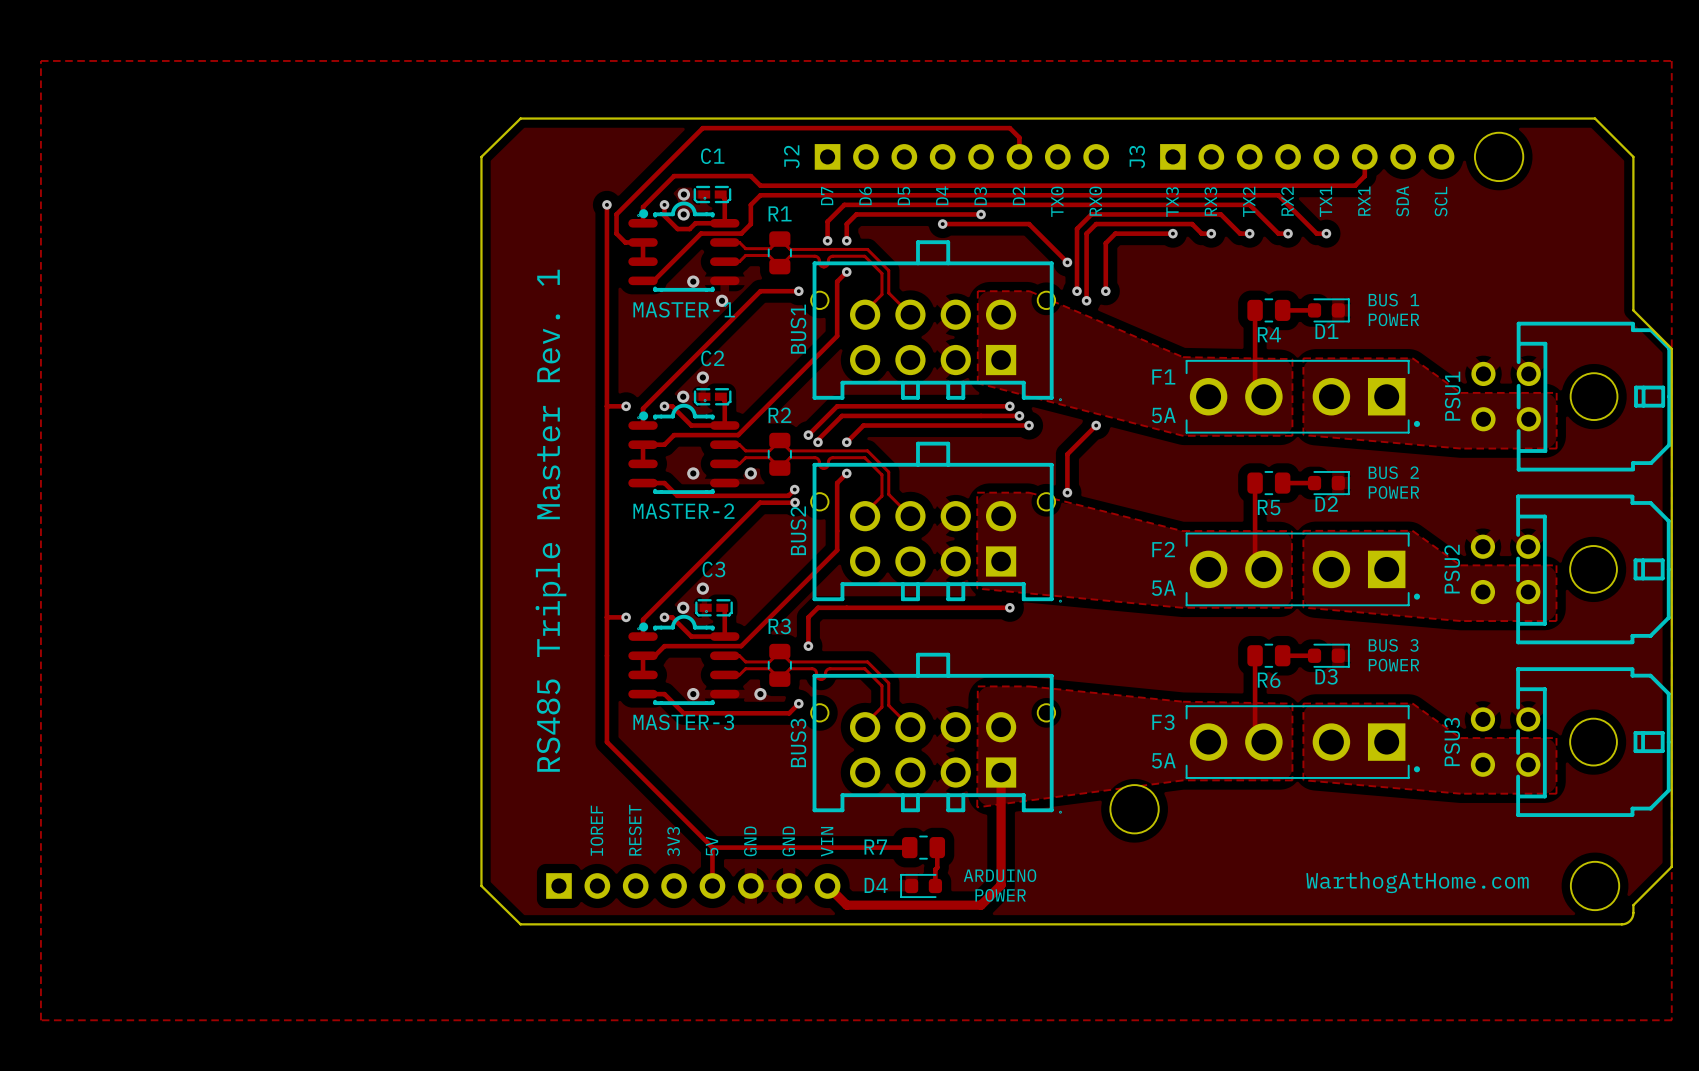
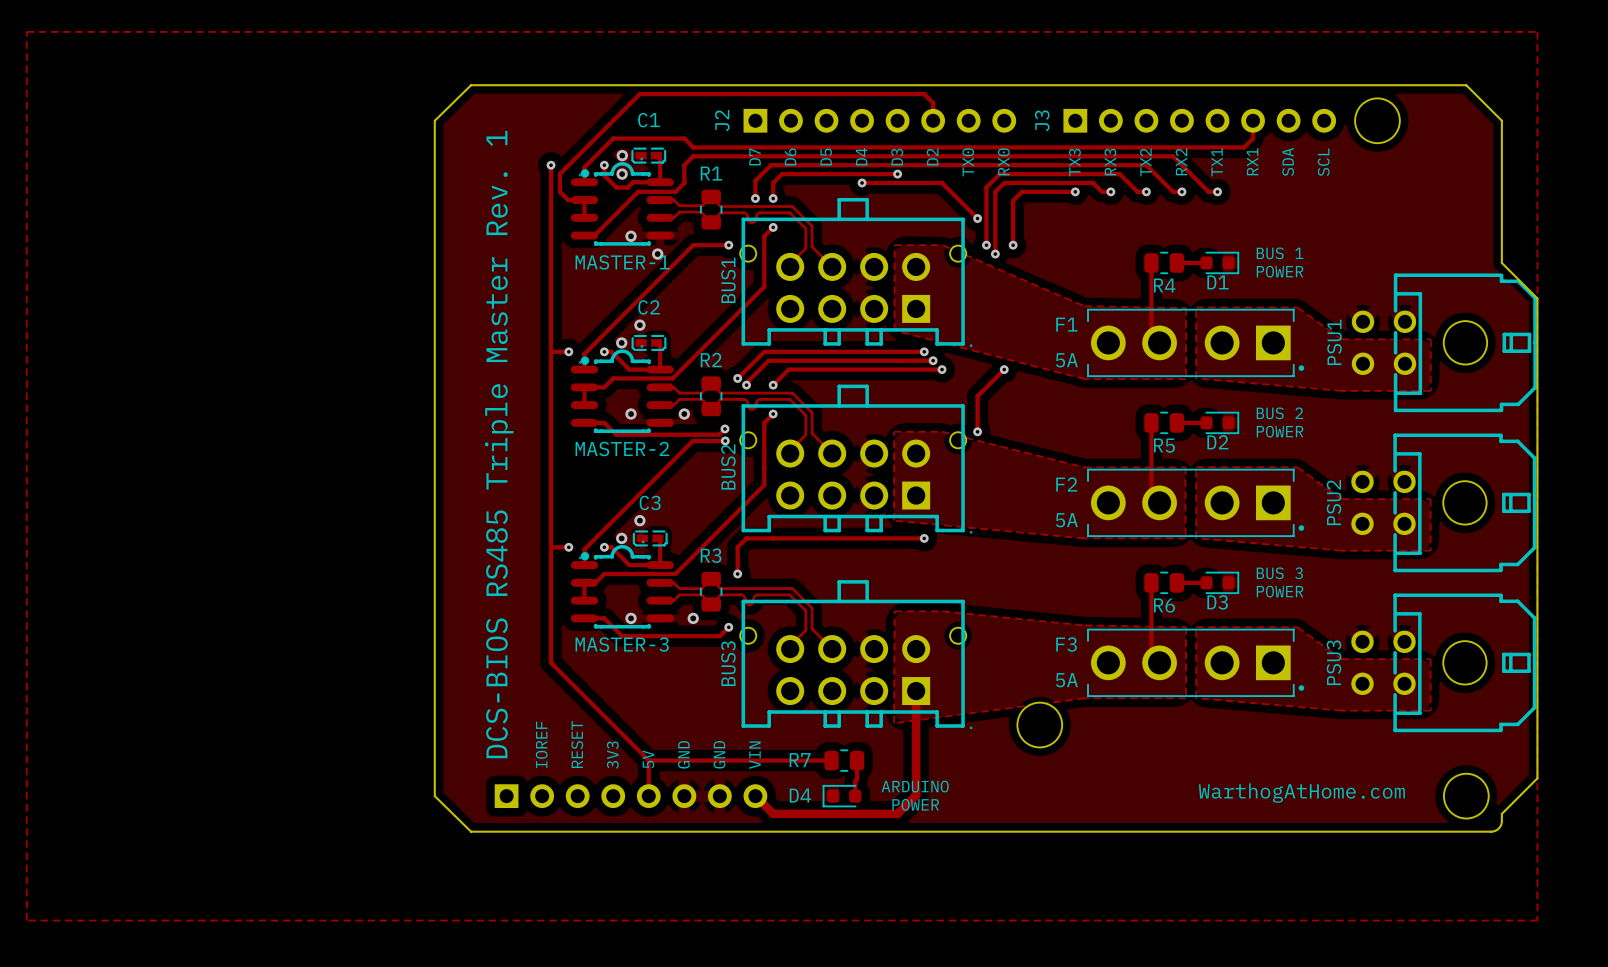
text: RS485 Triple Master Rev. 1 (550, 520) -> DCS-BIOS RS485 Triple Master Rev. 1 (499, 444)

